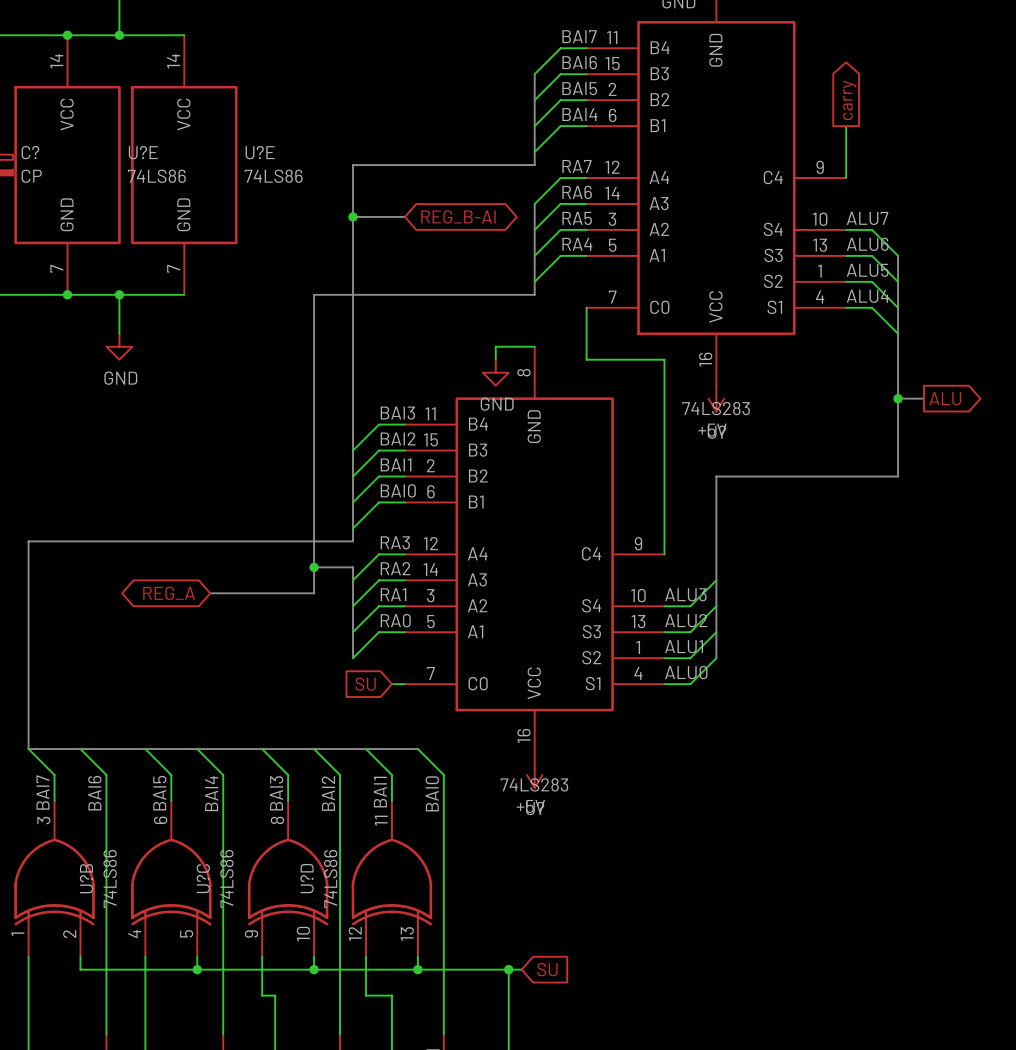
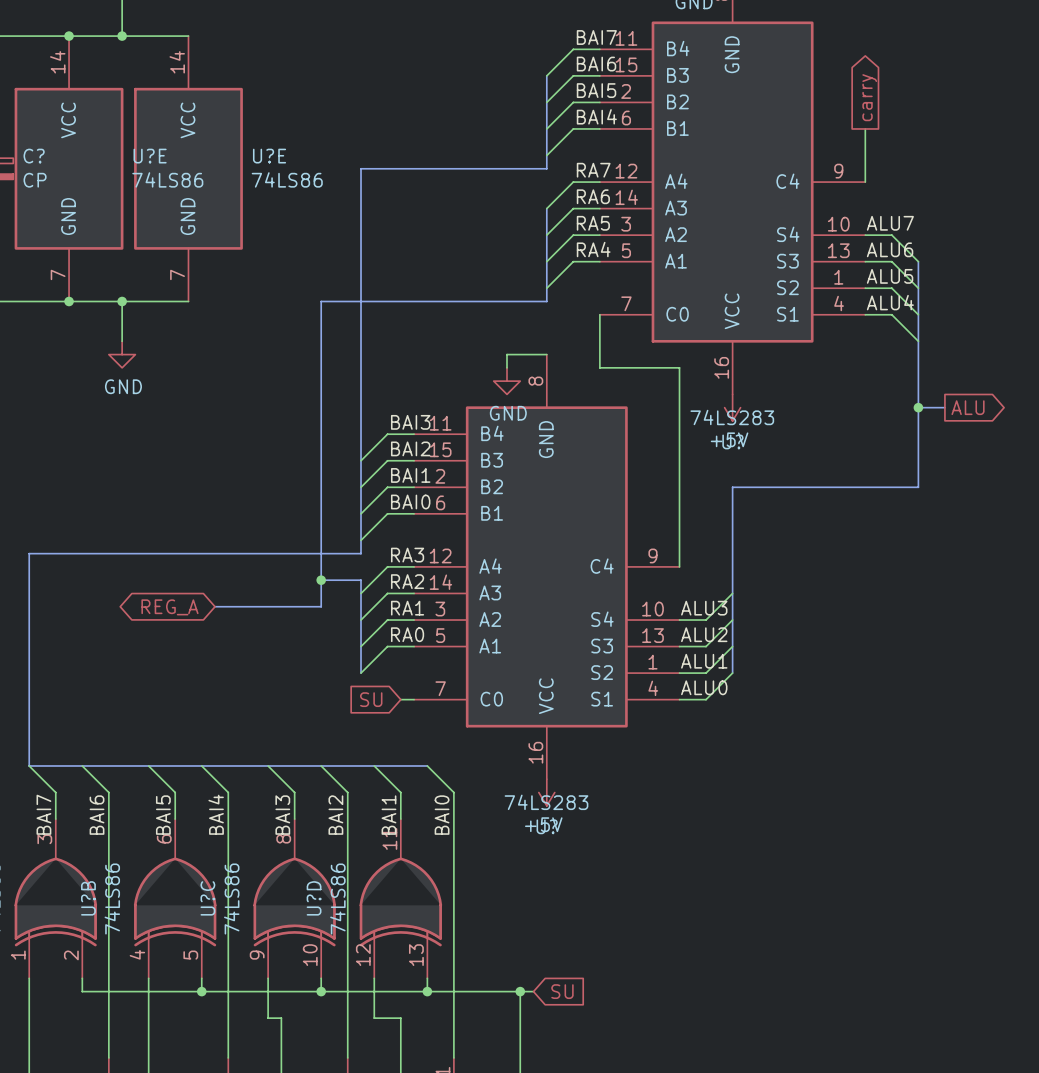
bus: (353, 216) (404, 216) -> none
junction: (353, 216) -> none
global label: REG_B-AI (458, 216) -> none

